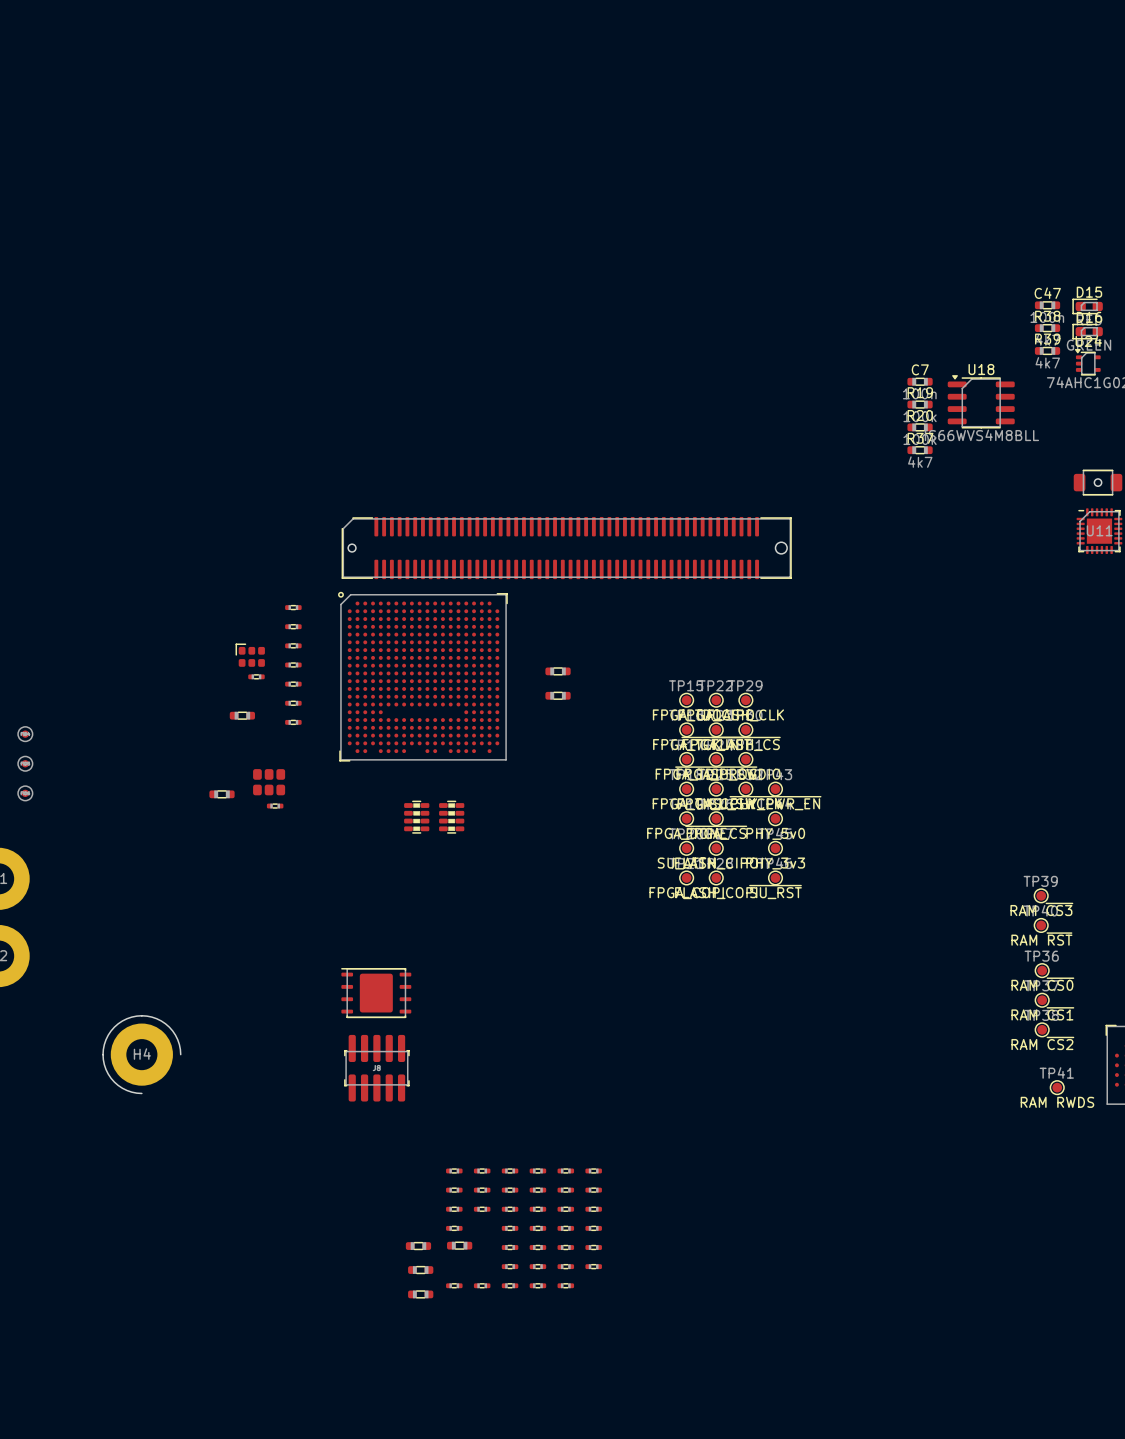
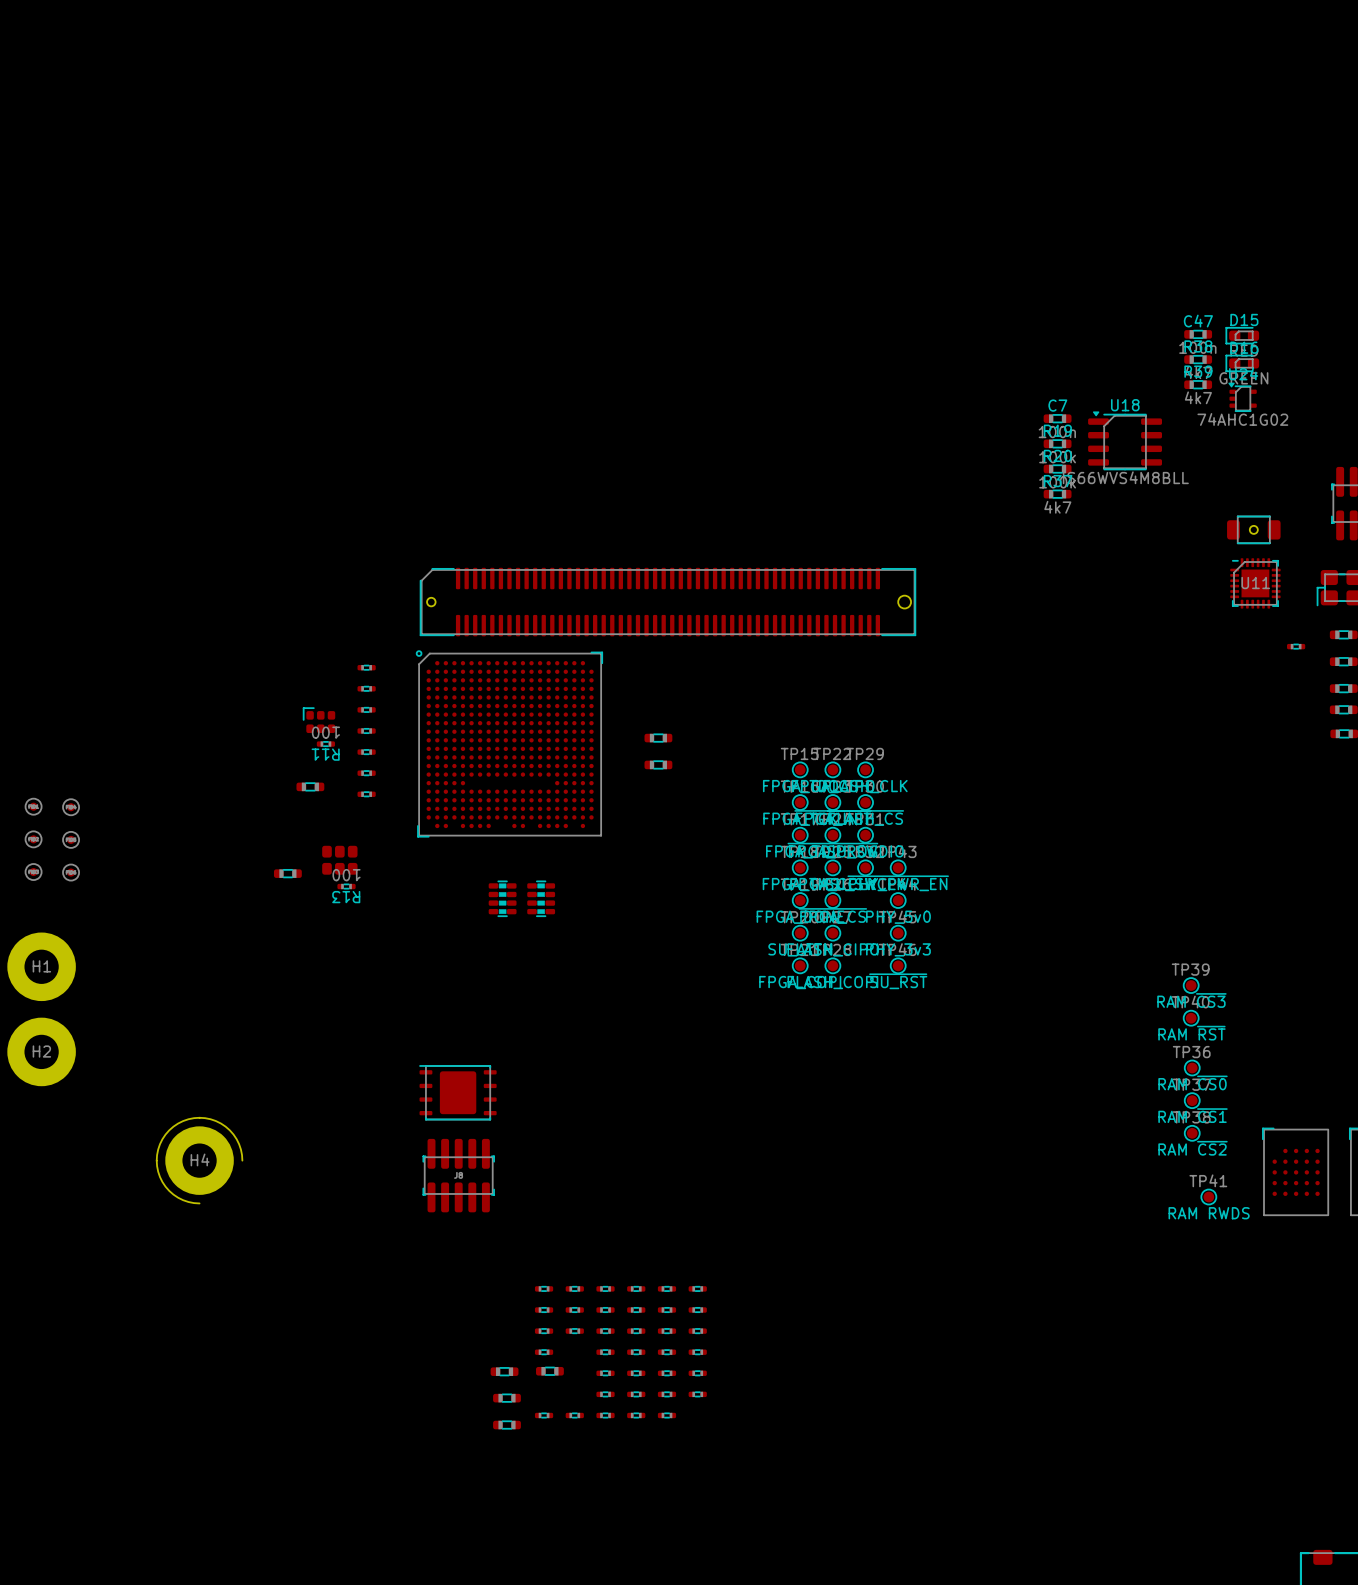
R11 value: none -> 100 (325, 732)
R11 name: none -> R11 (325, 754)
R13 value: none -> 100 (346, 875)
R13 name: none -> R13 (346, 897)

